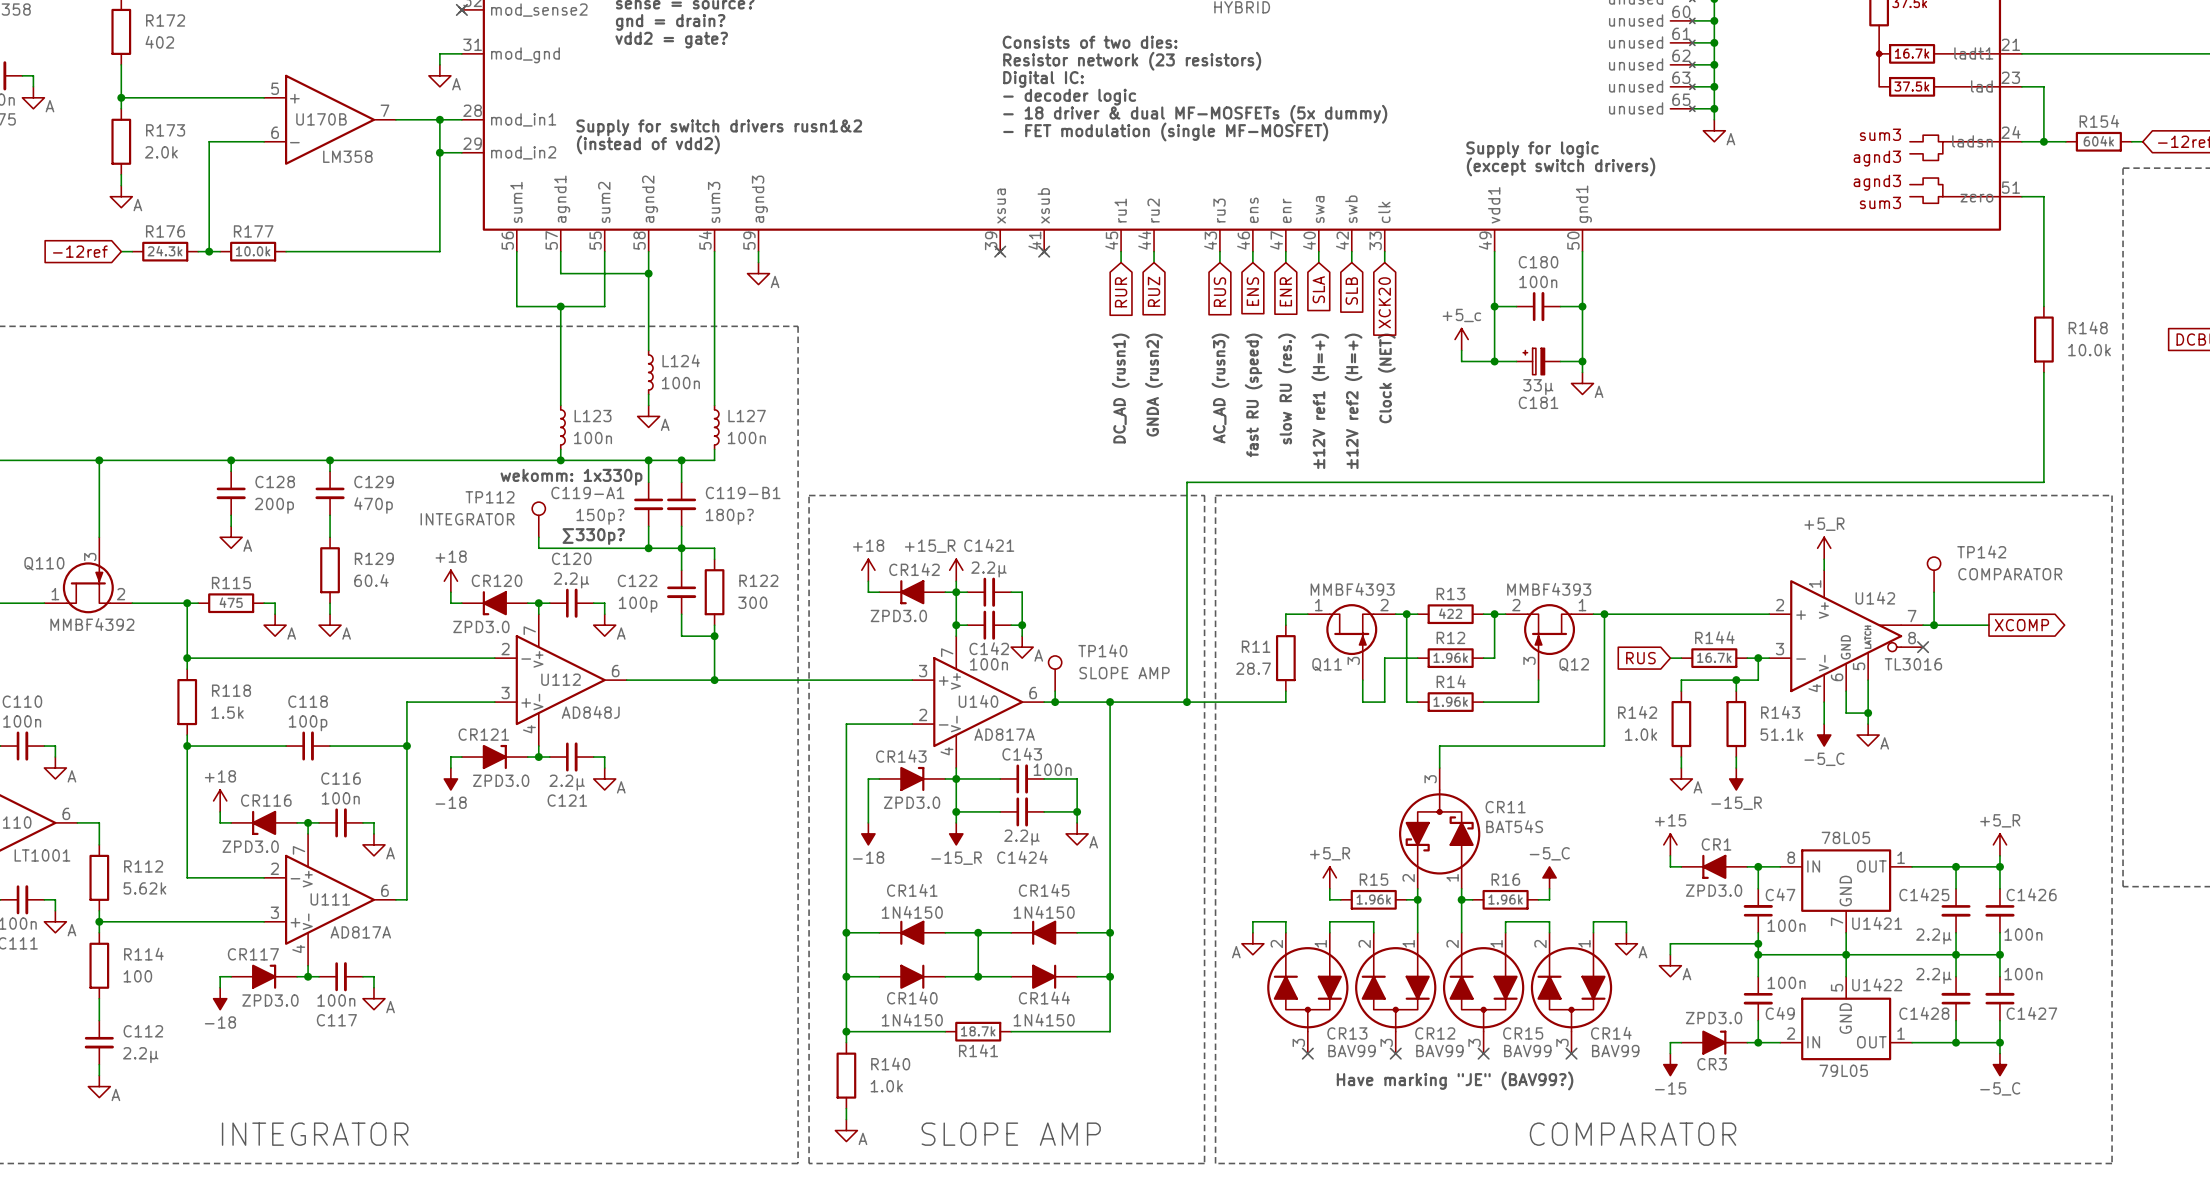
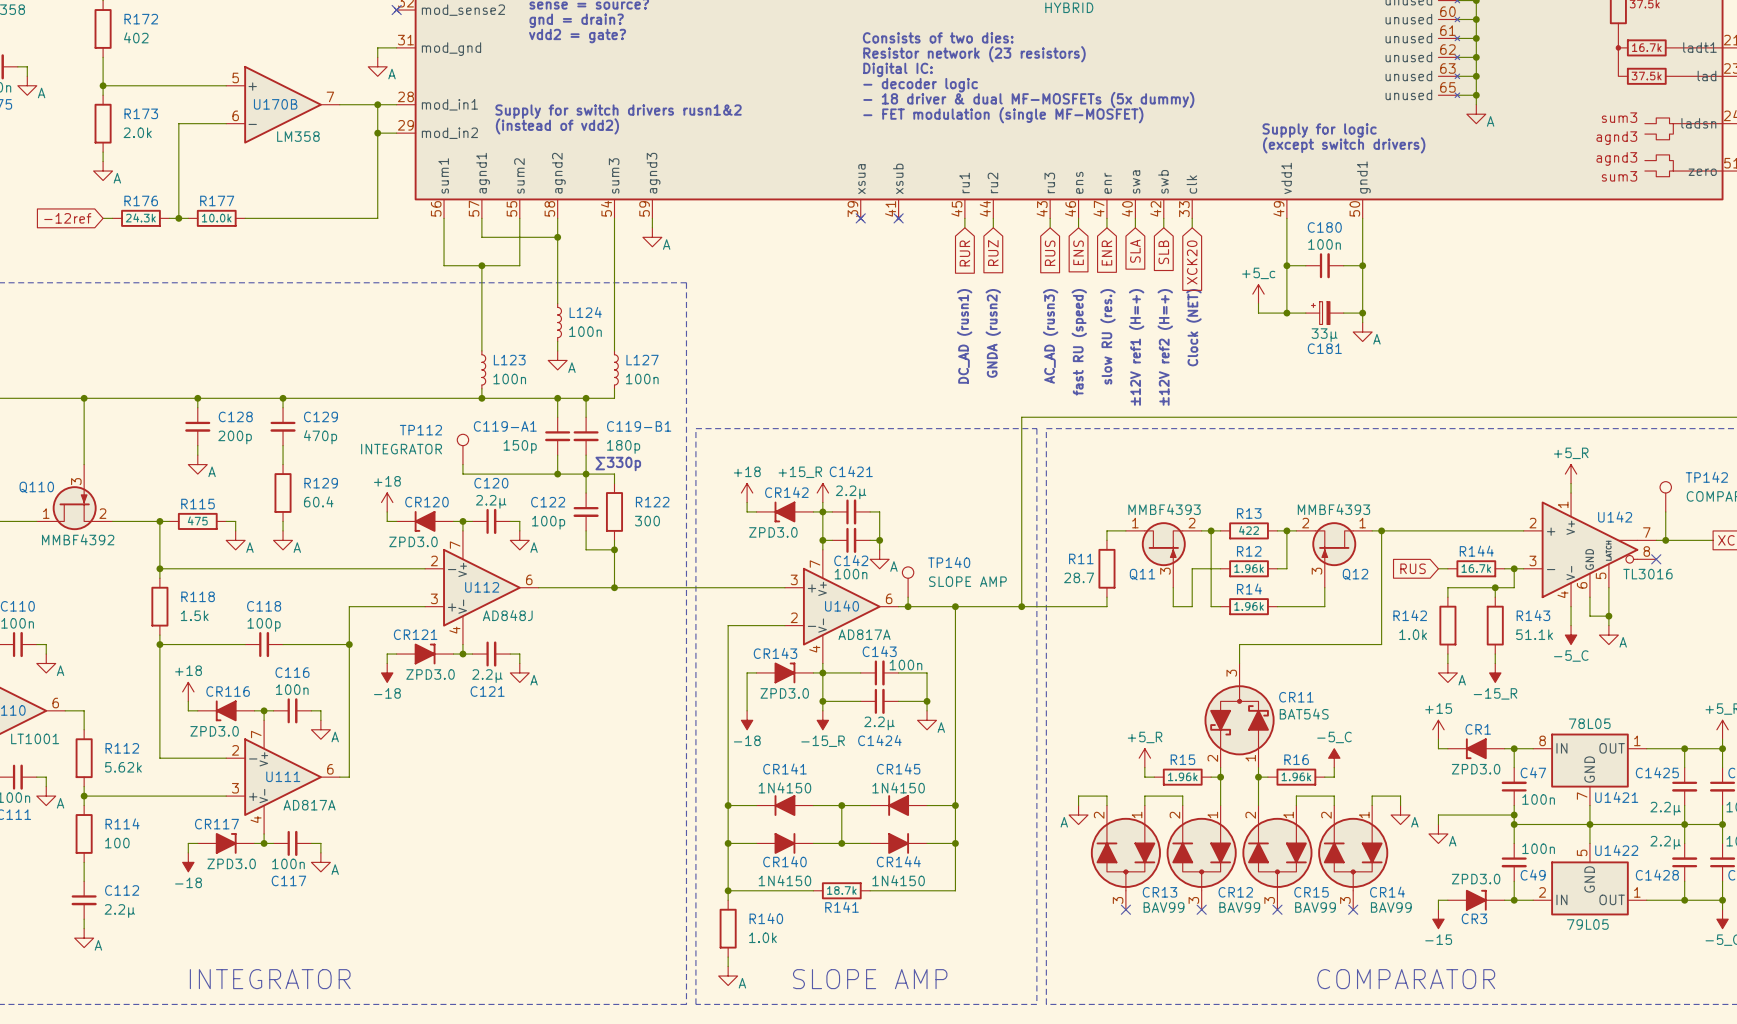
text: wekomm: 1x330p (571, 477) -> none
C119-A1 value: 150p? (600, 516) -> 150p (520, 446)
C119-B1 value: 180p? (729, 516) -> 180p (623, 446)
text: ∑330p? (593, 536) -> none
text: none -> ∑330p (618, 463)
text: Have marking "JE" (BAV99?) (1455, 1080) -> none

